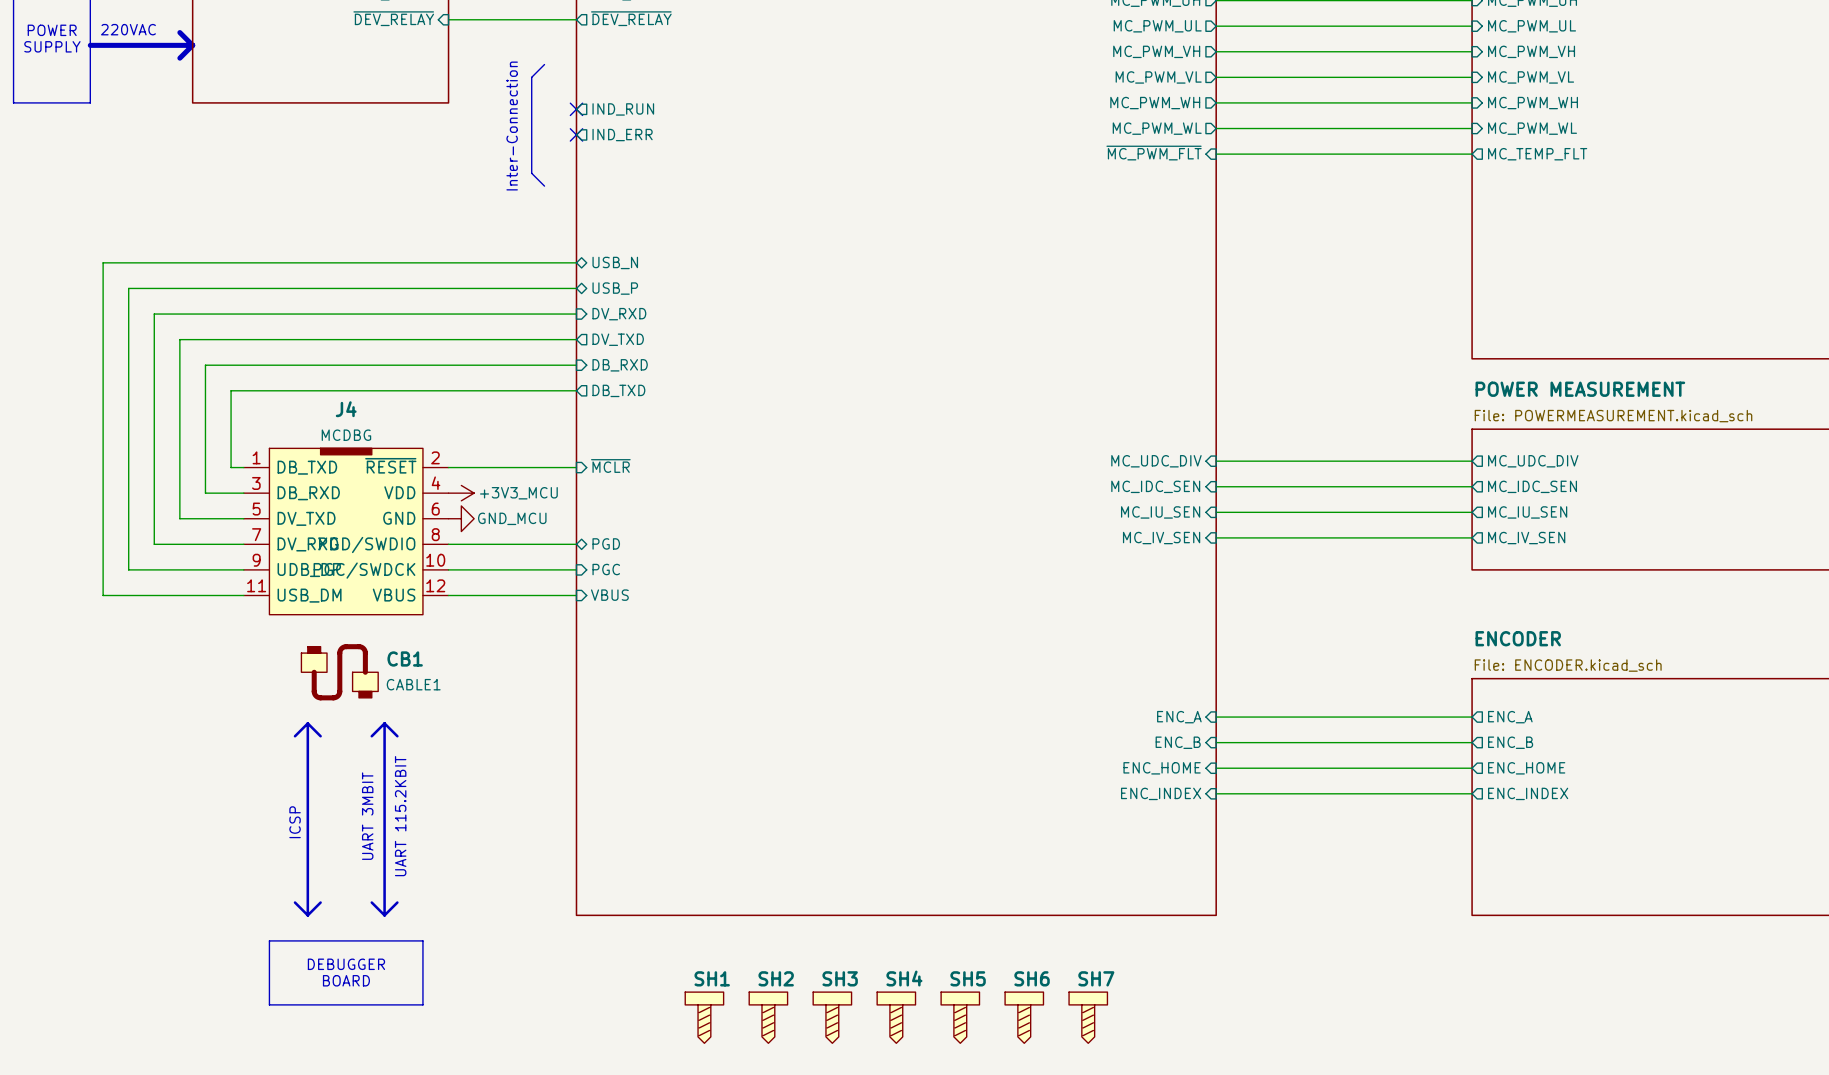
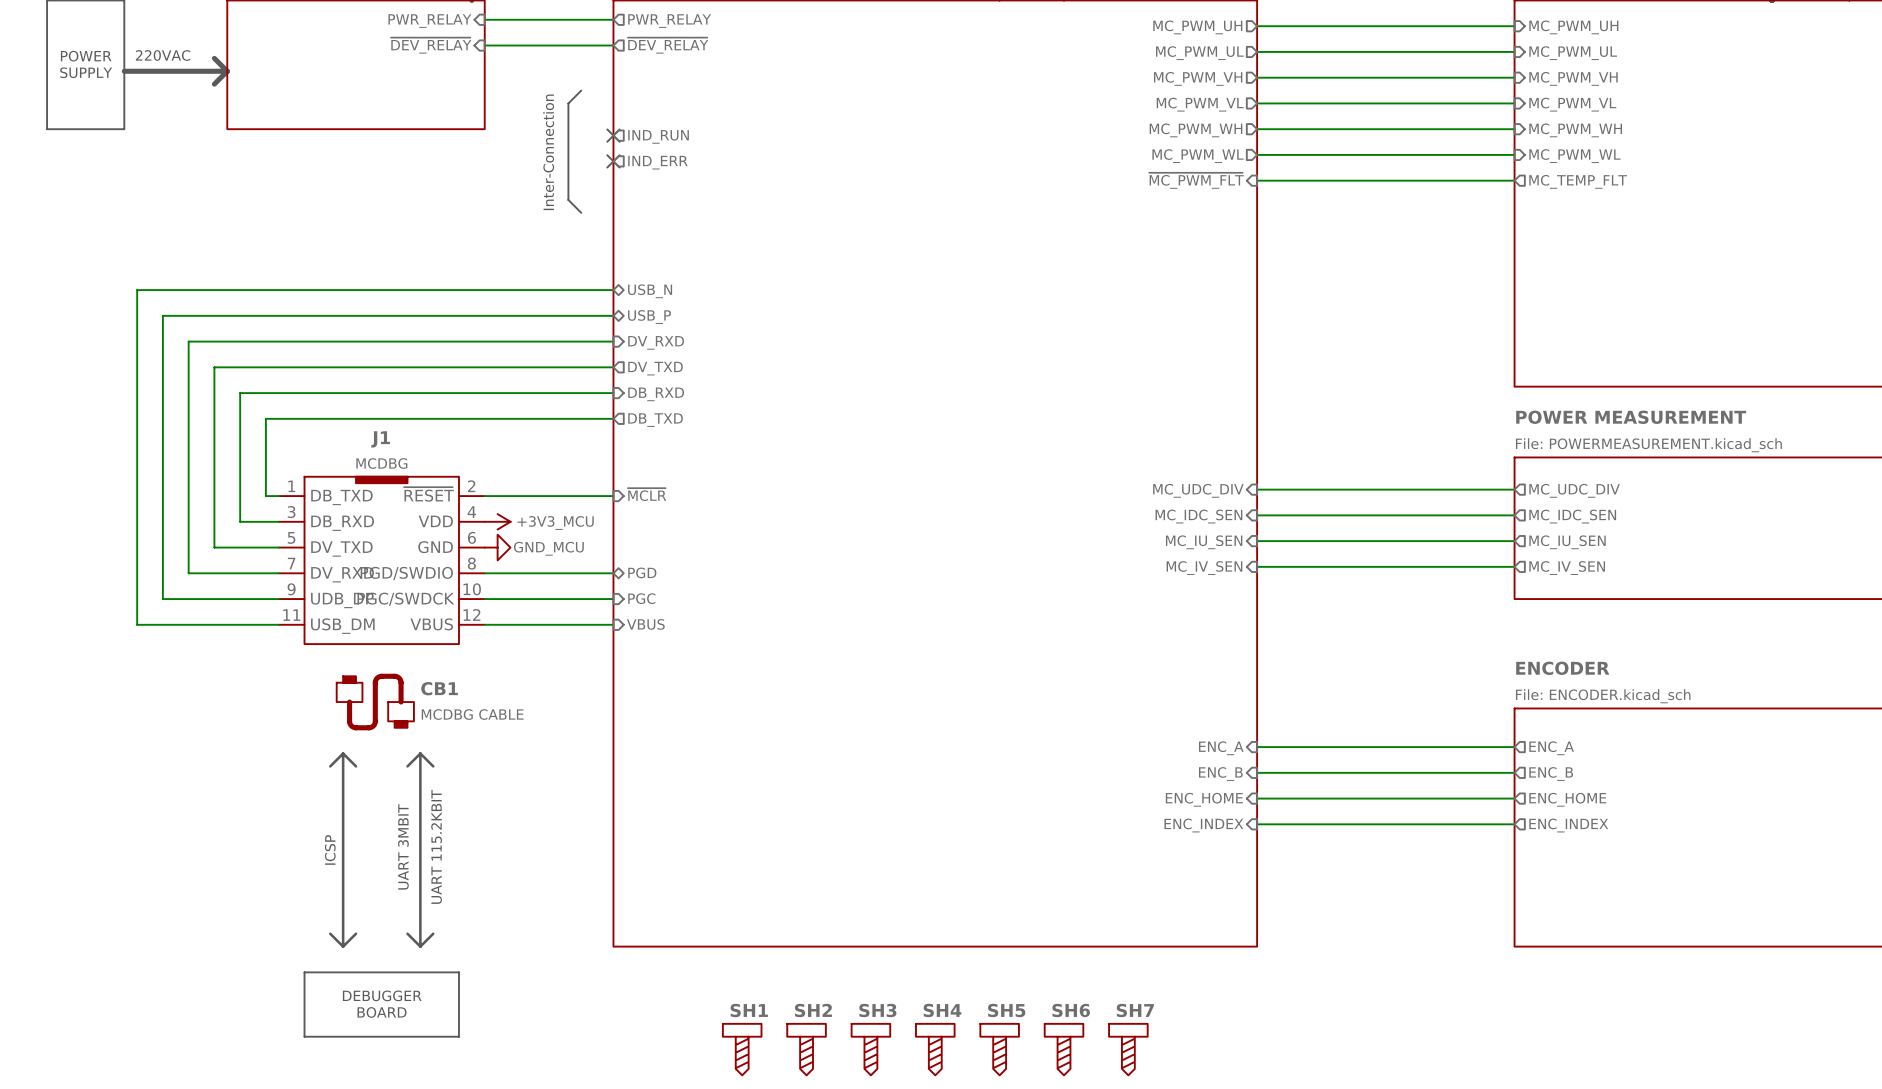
J4 name: J4 (346, 409) -> J1 (380, 439)
CB1 value: CABLE1 (413, 684) -> MCDBG CABLE (472, 714)

